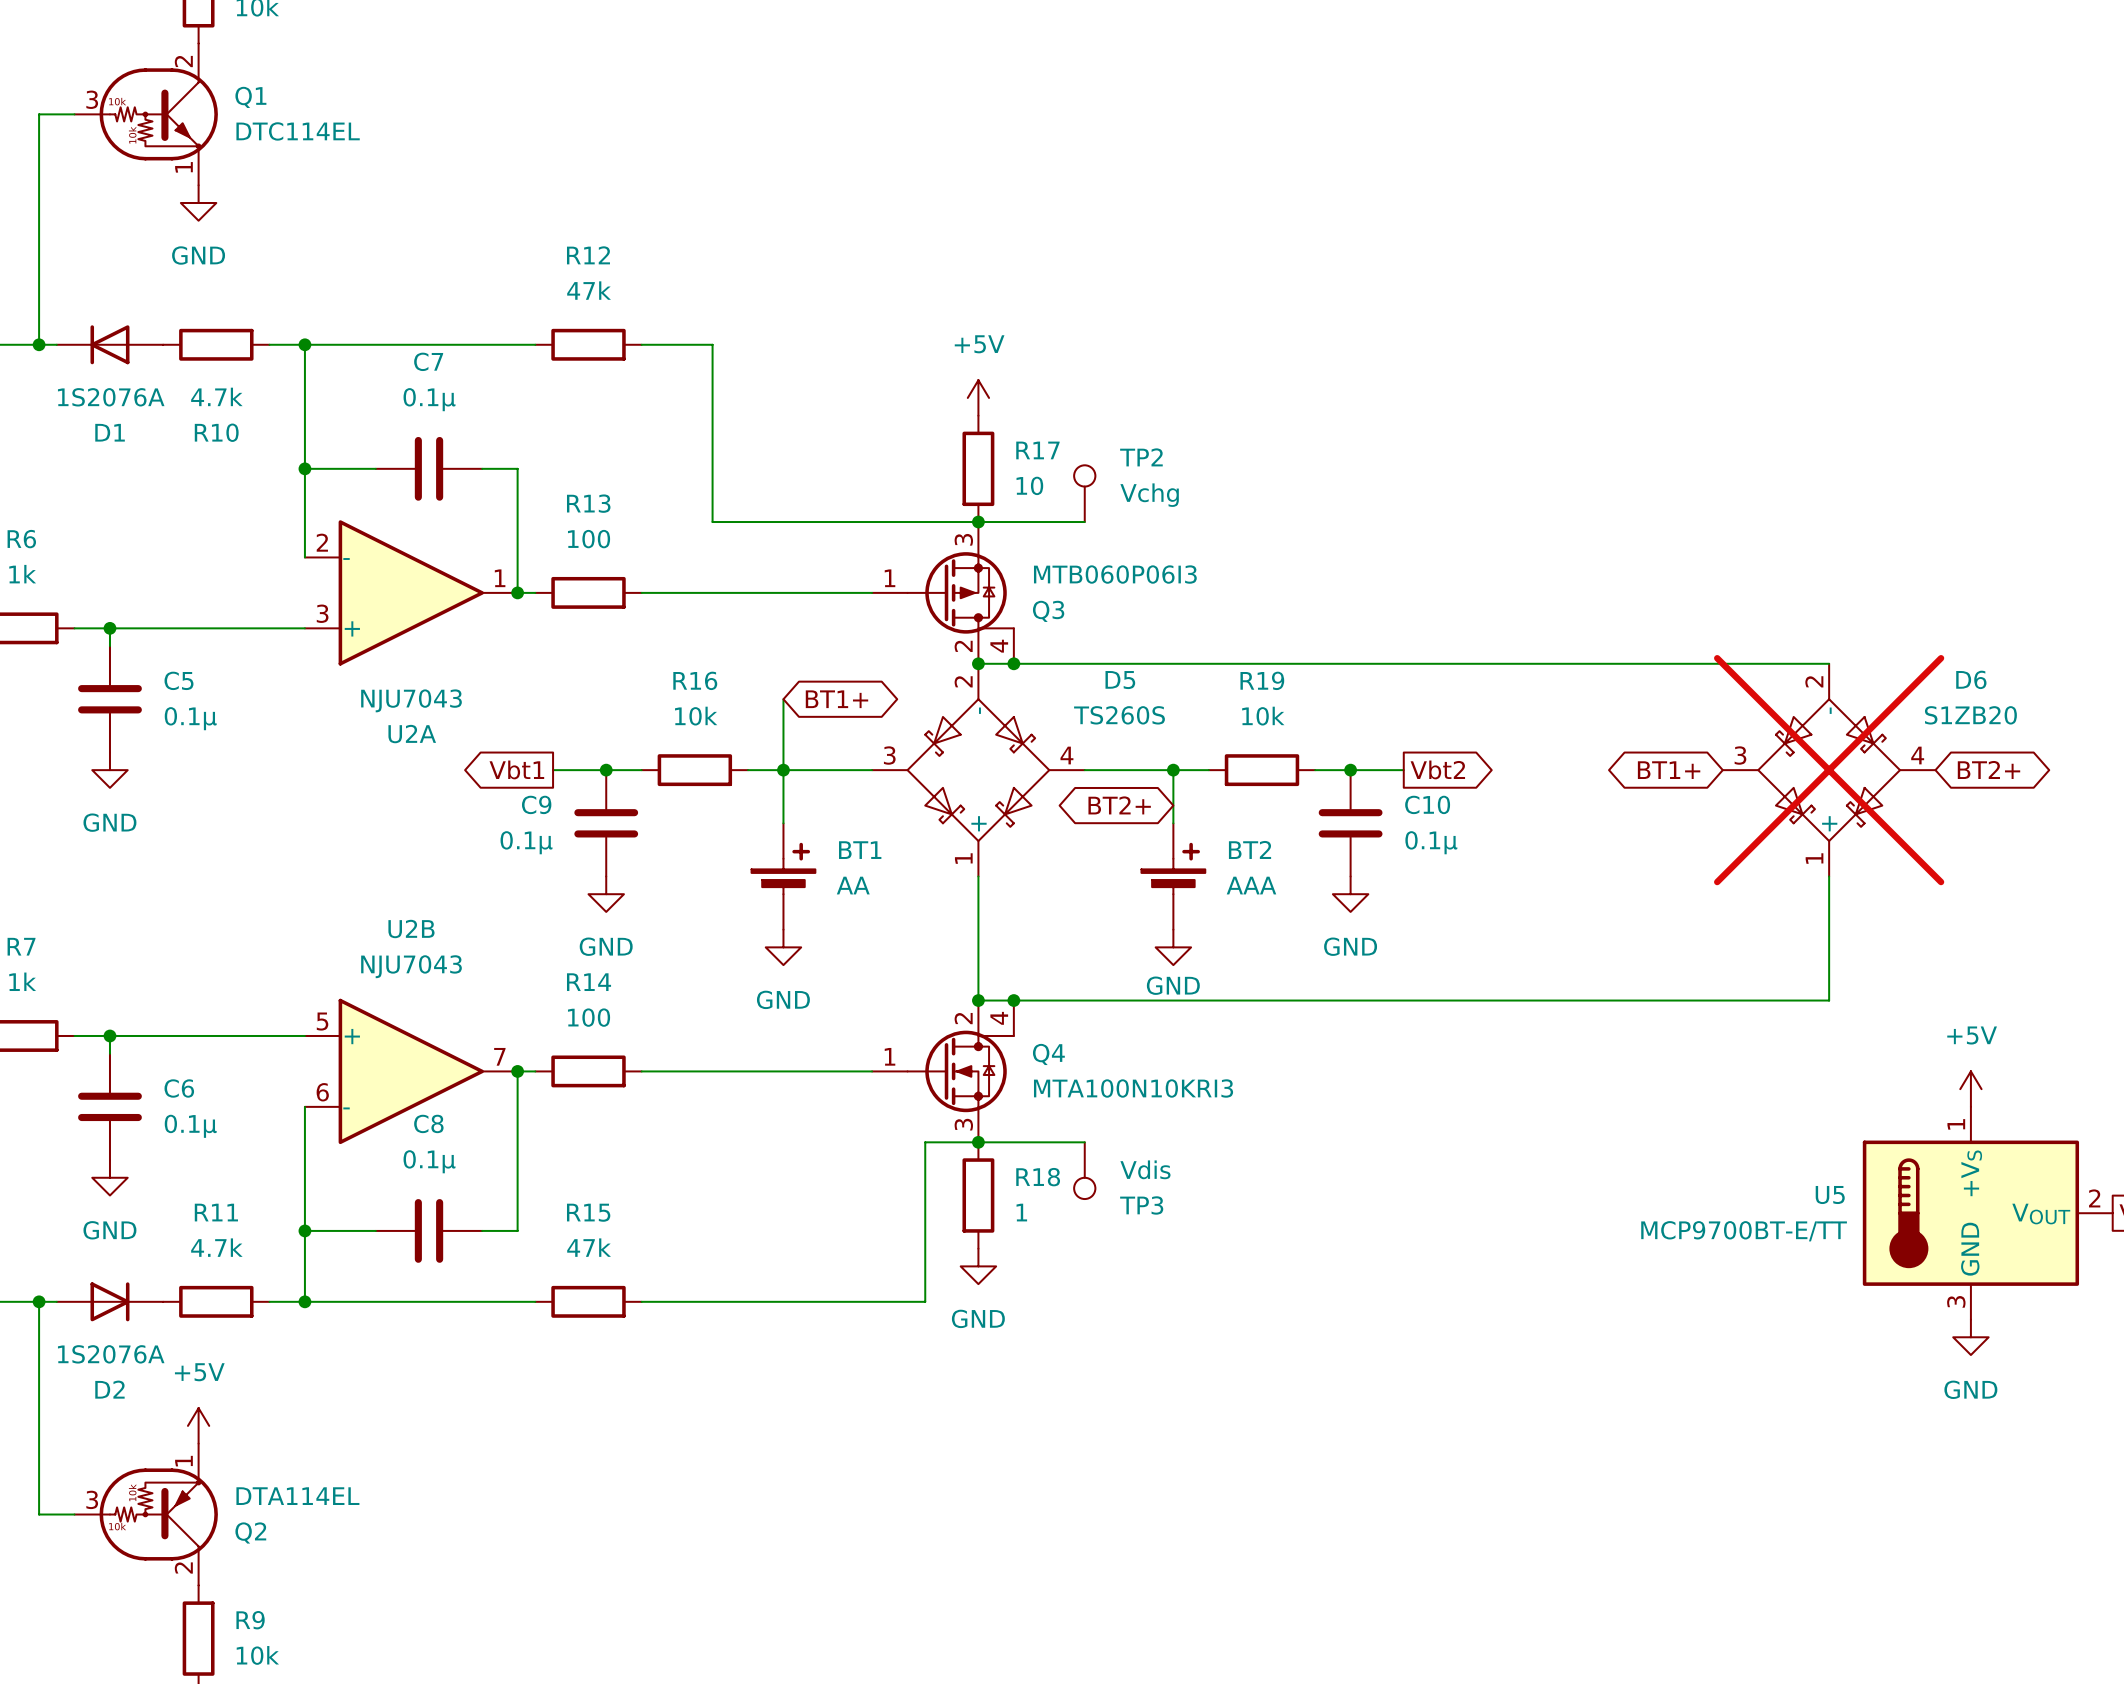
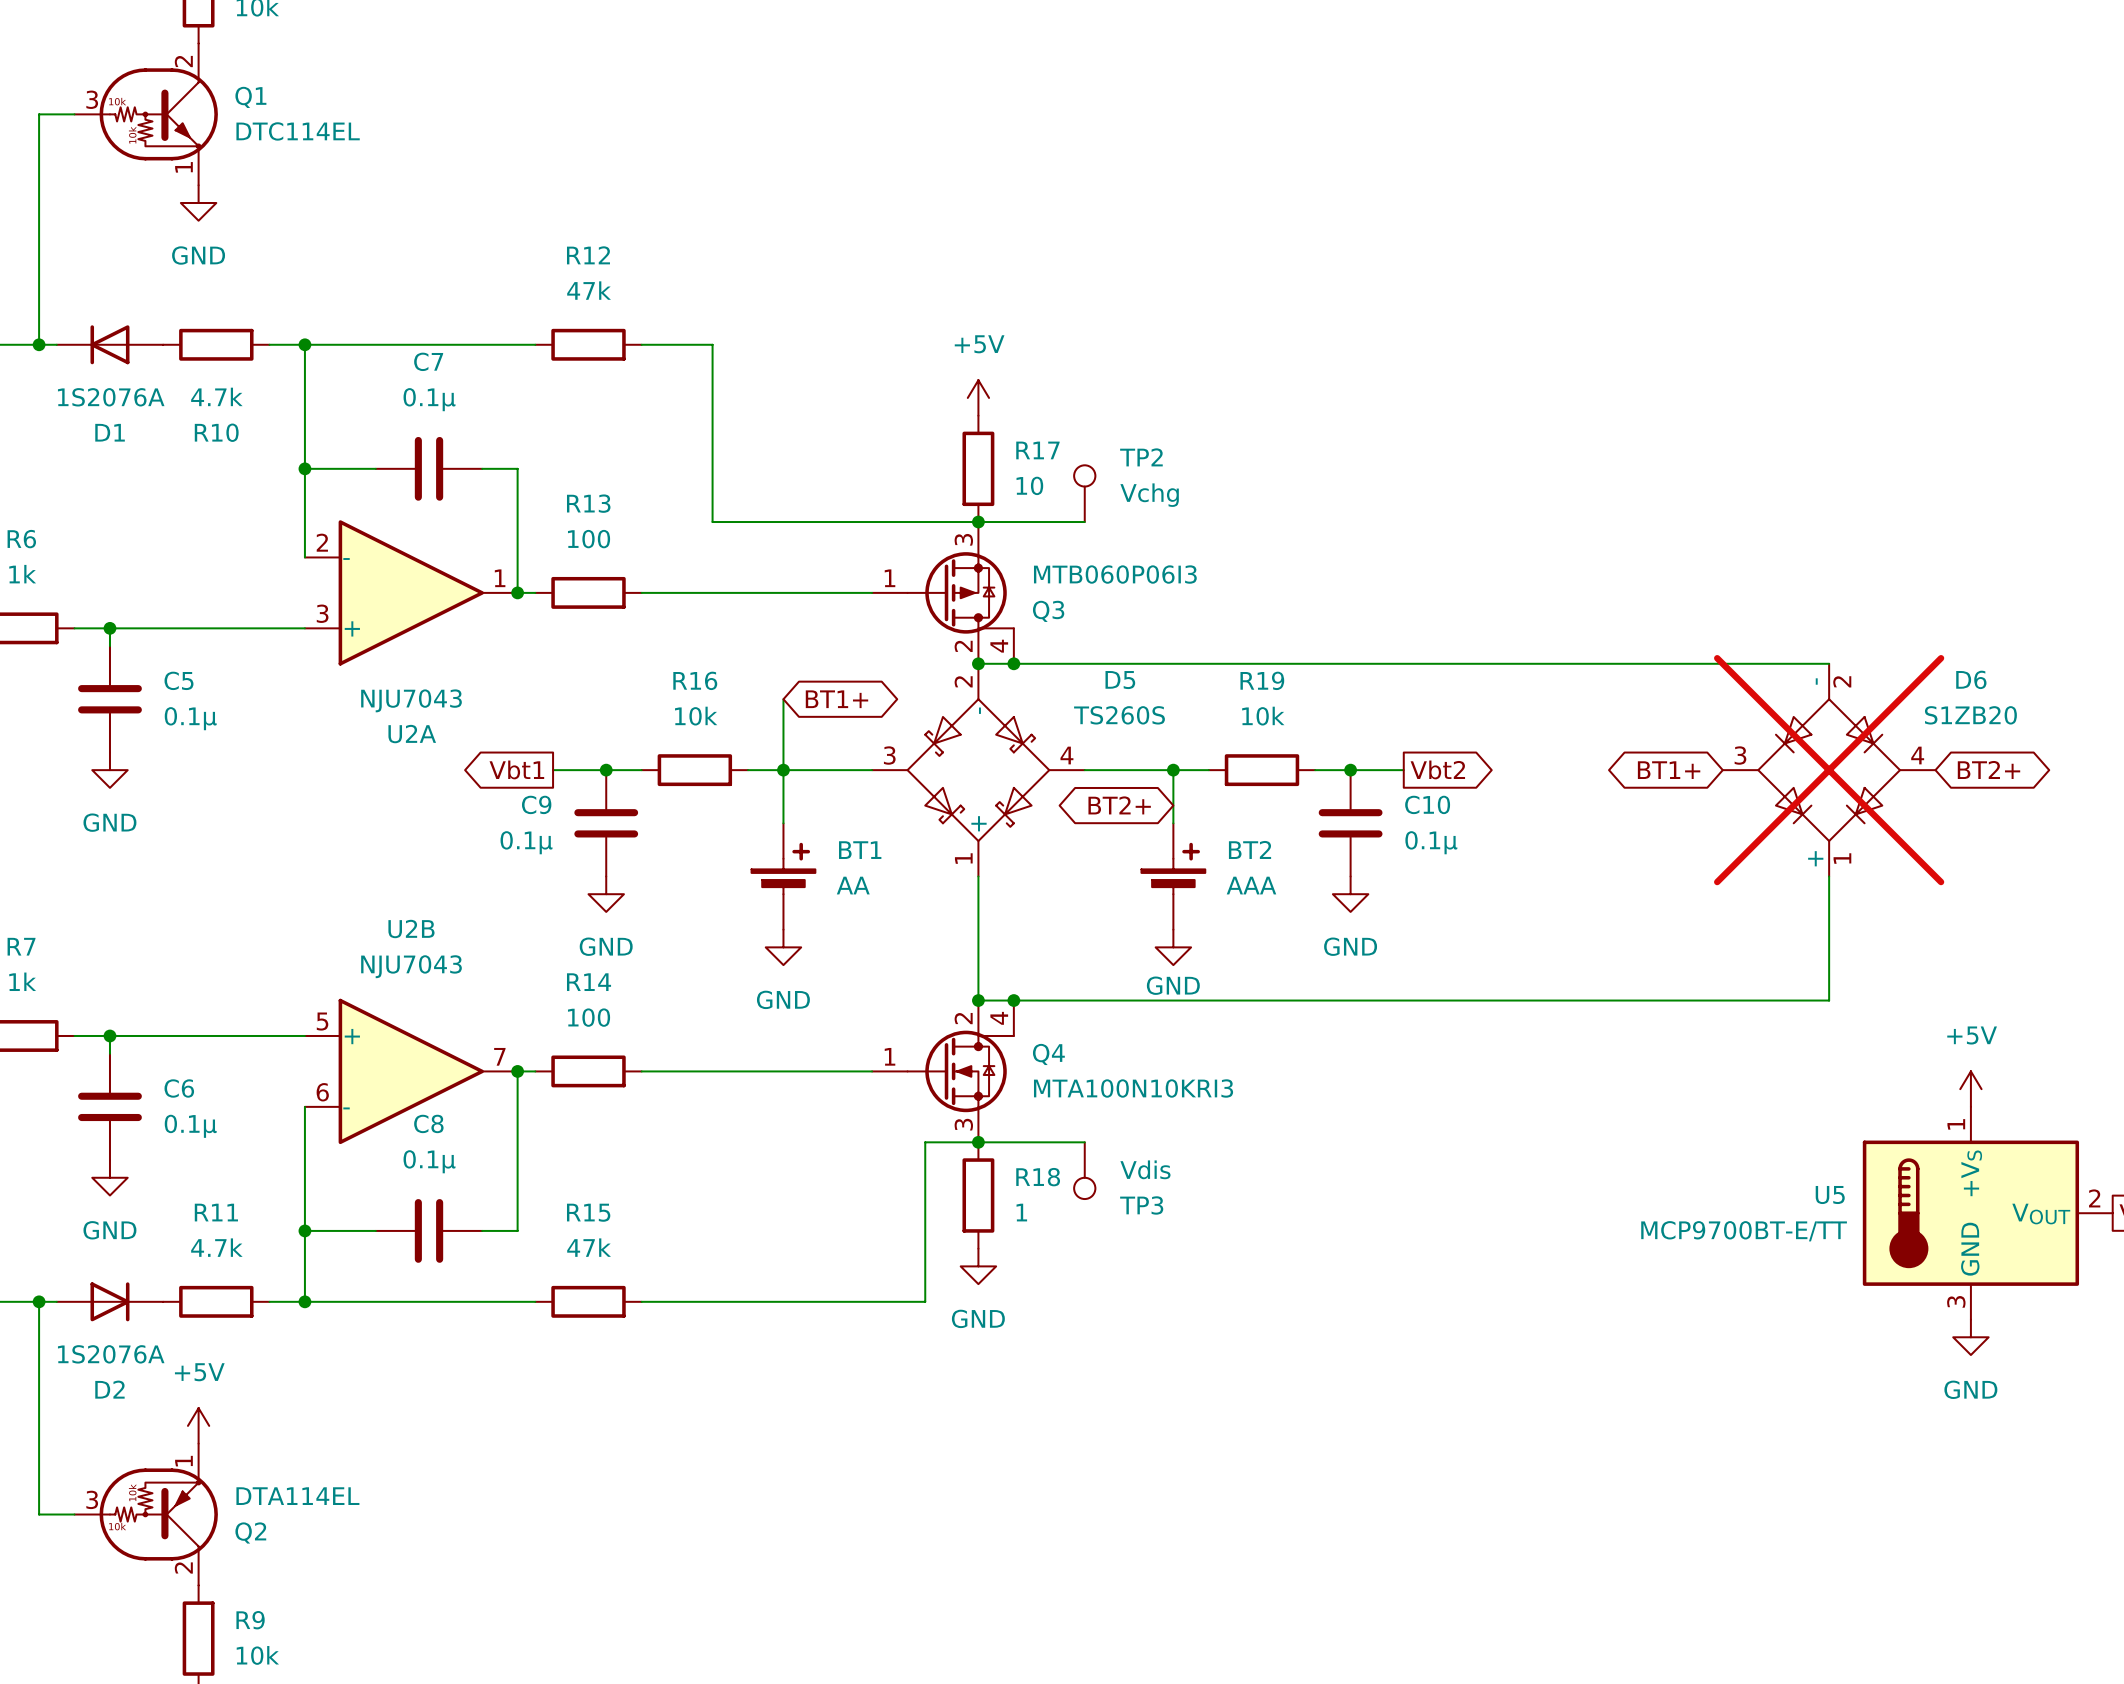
D6 symbol: [1722, 663, 1936, 877] -> [1722, 663, 1936, 877]

